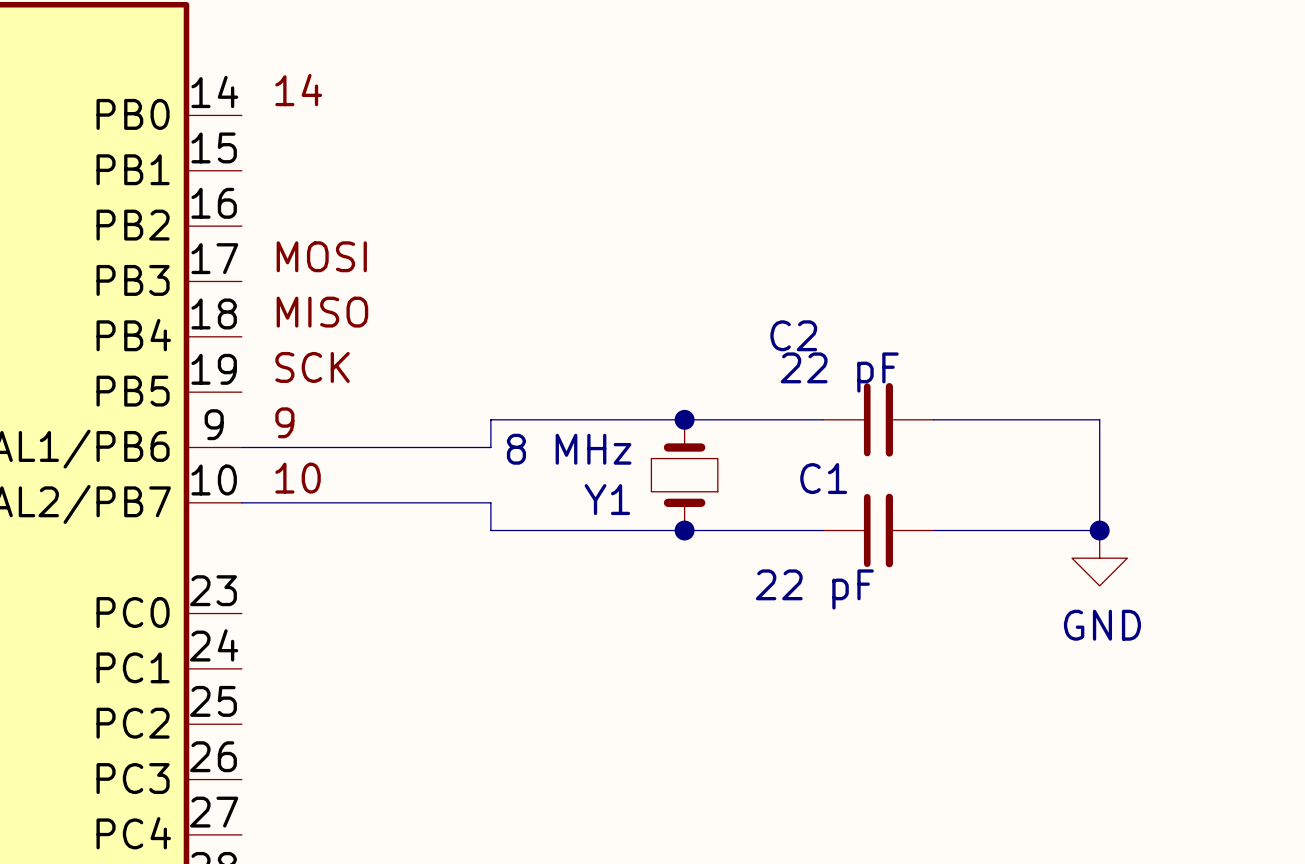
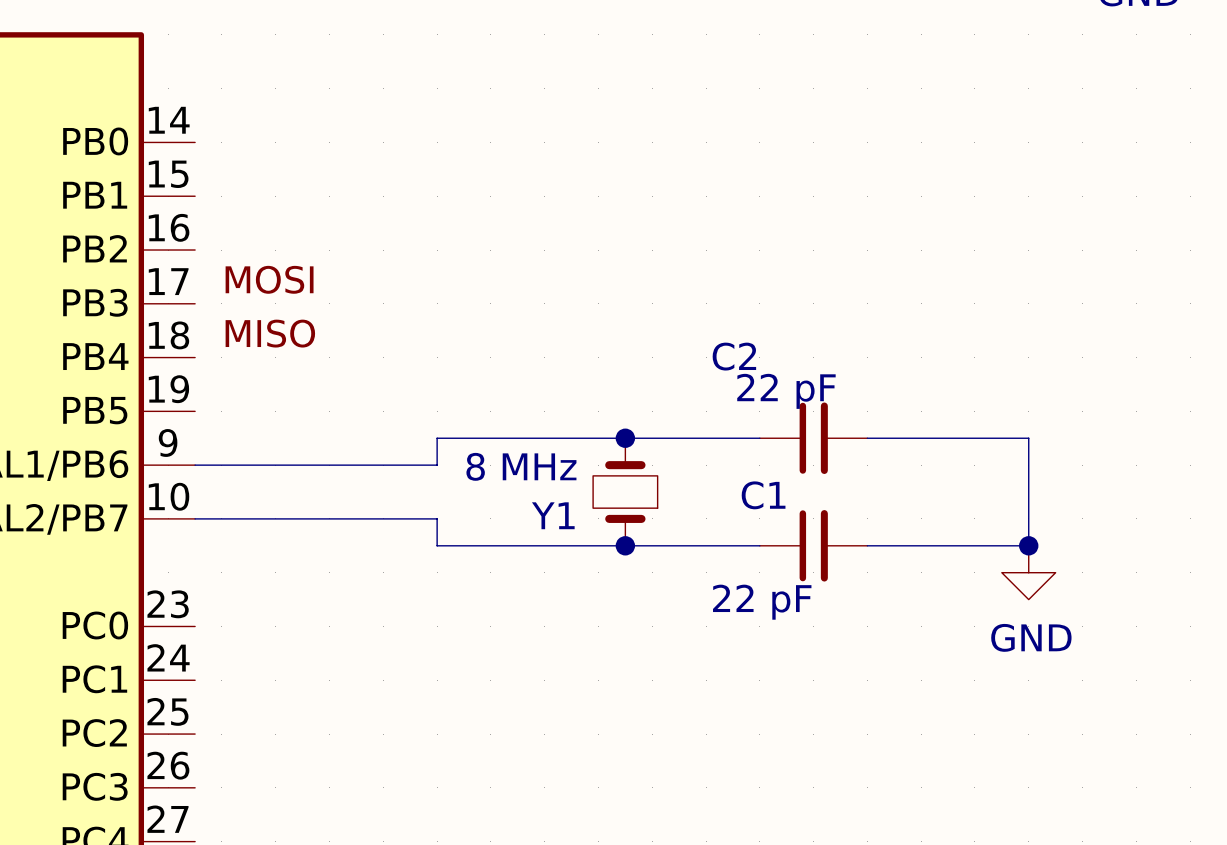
label: 14 (298, 90) -> none
label: SCK (312, 367) -> none
label: 9 (284, 422) -> none
label: 10 (298, 478) -> none

